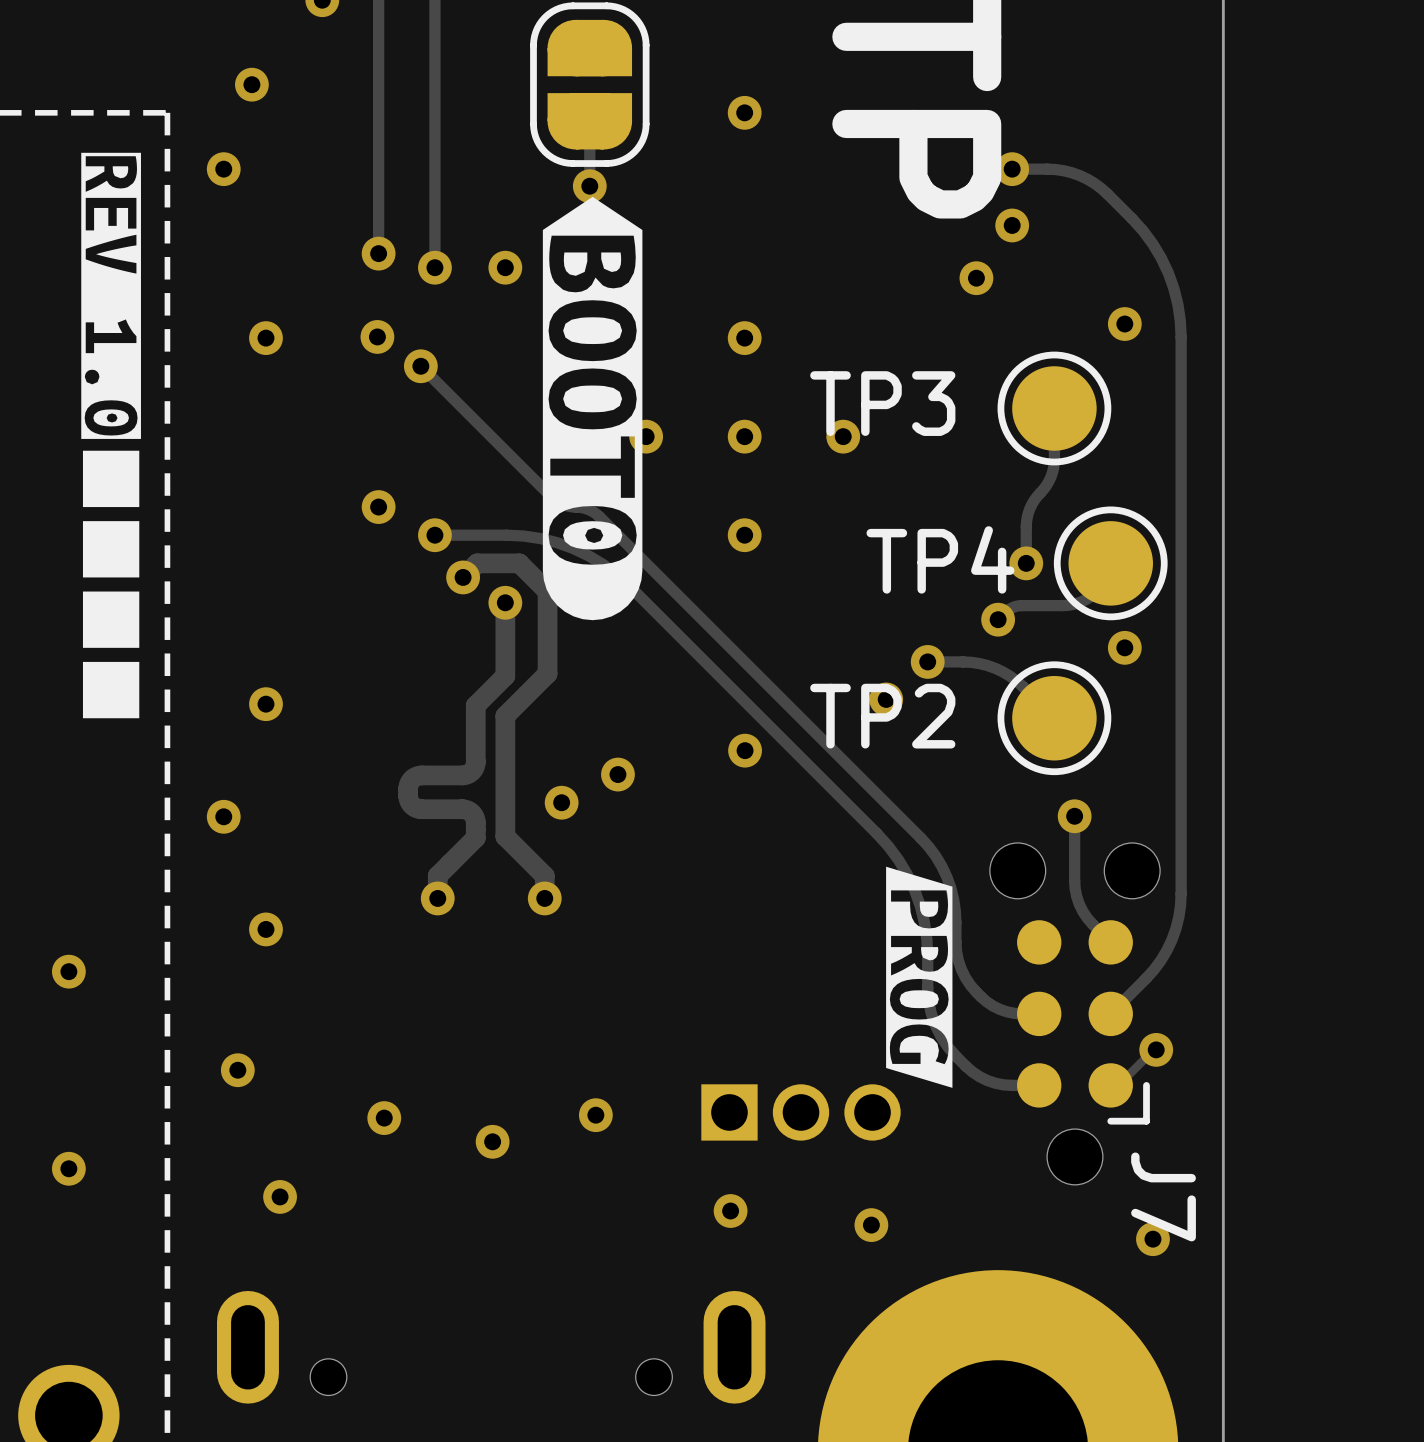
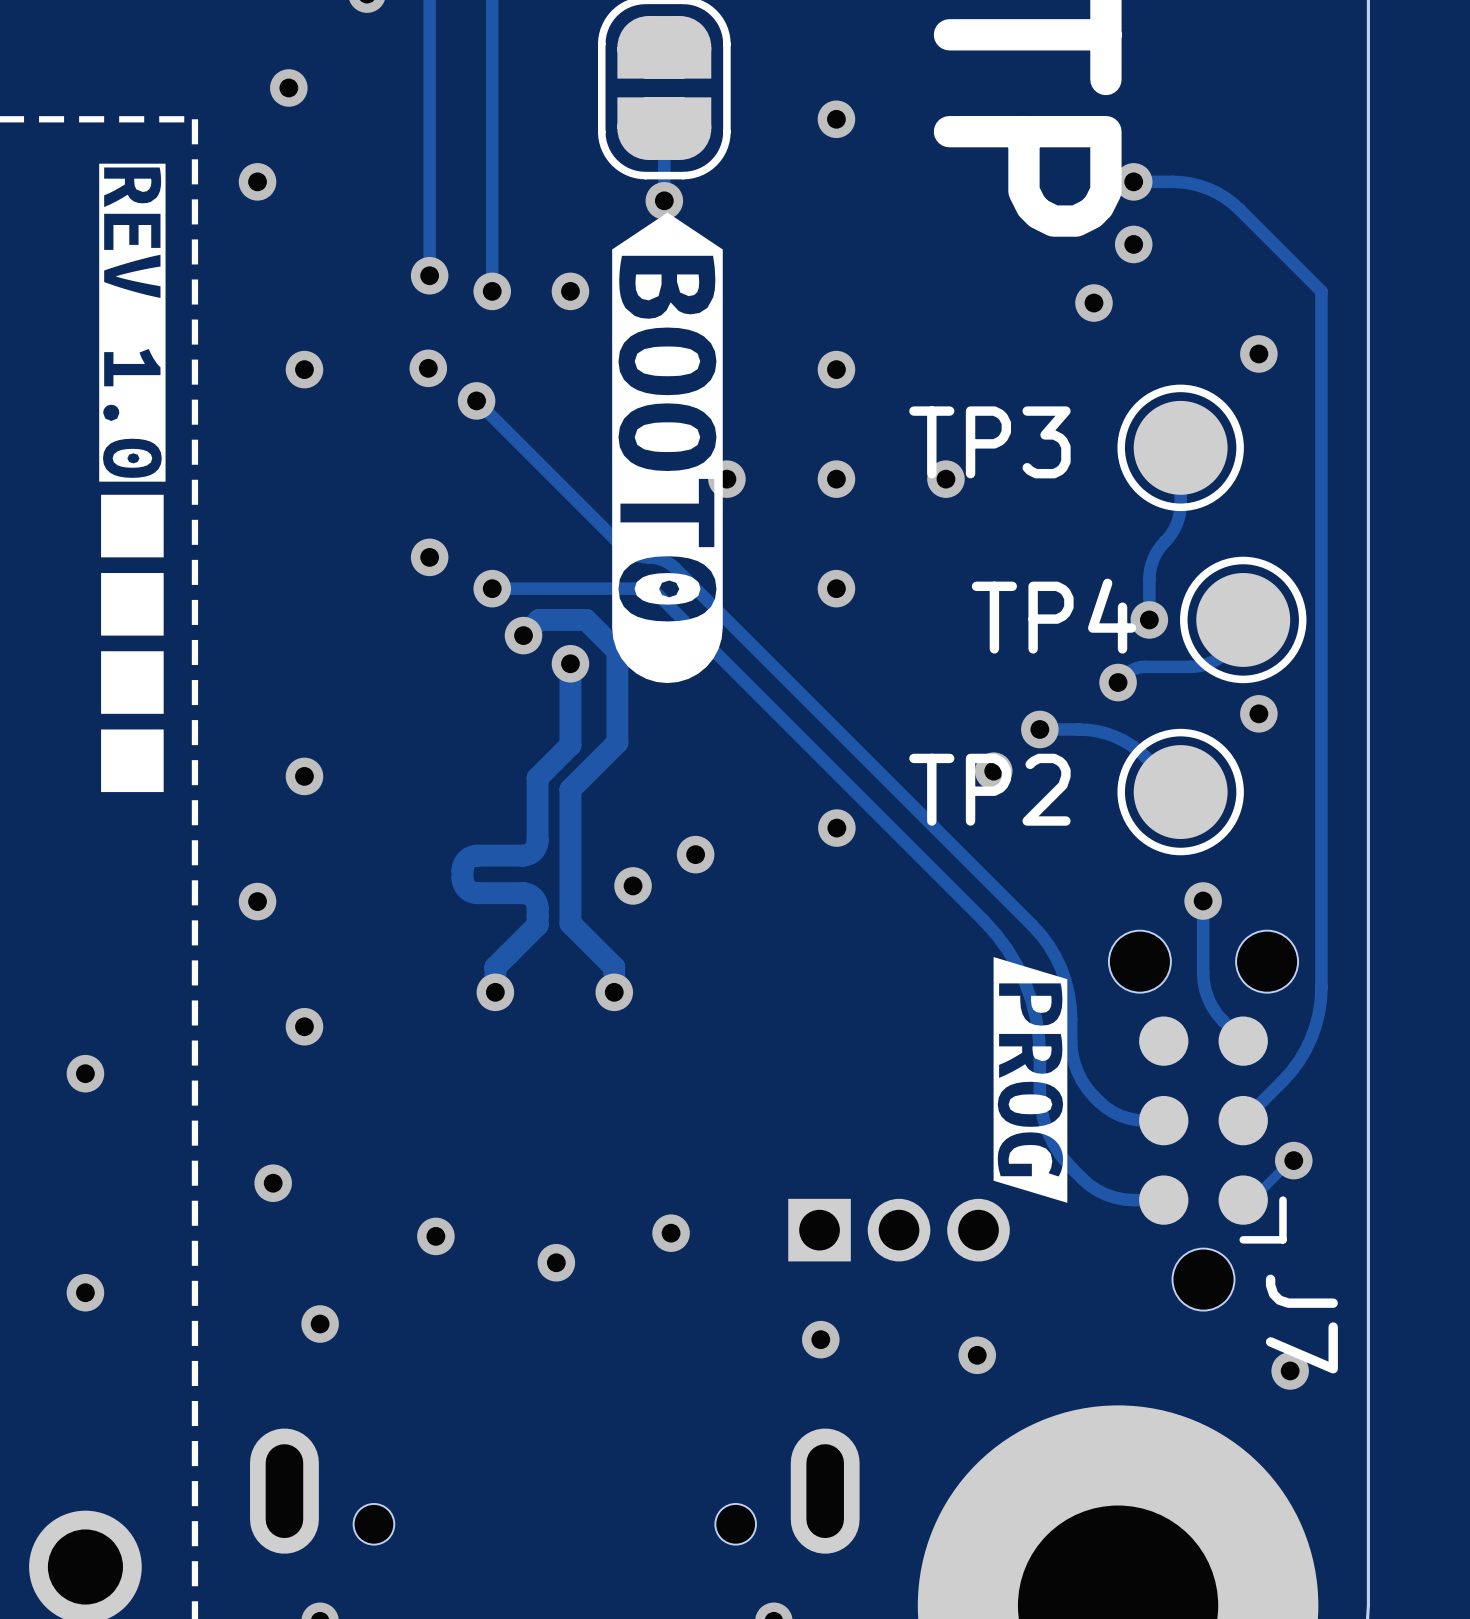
track: (1131, 218) (1152, 243) (1168, 273) (1177, 304) (1181, 337) -> (1266, 236) (1321, 291) (1321, 368)
track: (506, 535) (540, 538) (573, 548) (603, 564) (629, 585) -> (572, 588) (651, 588) (708, 645)

